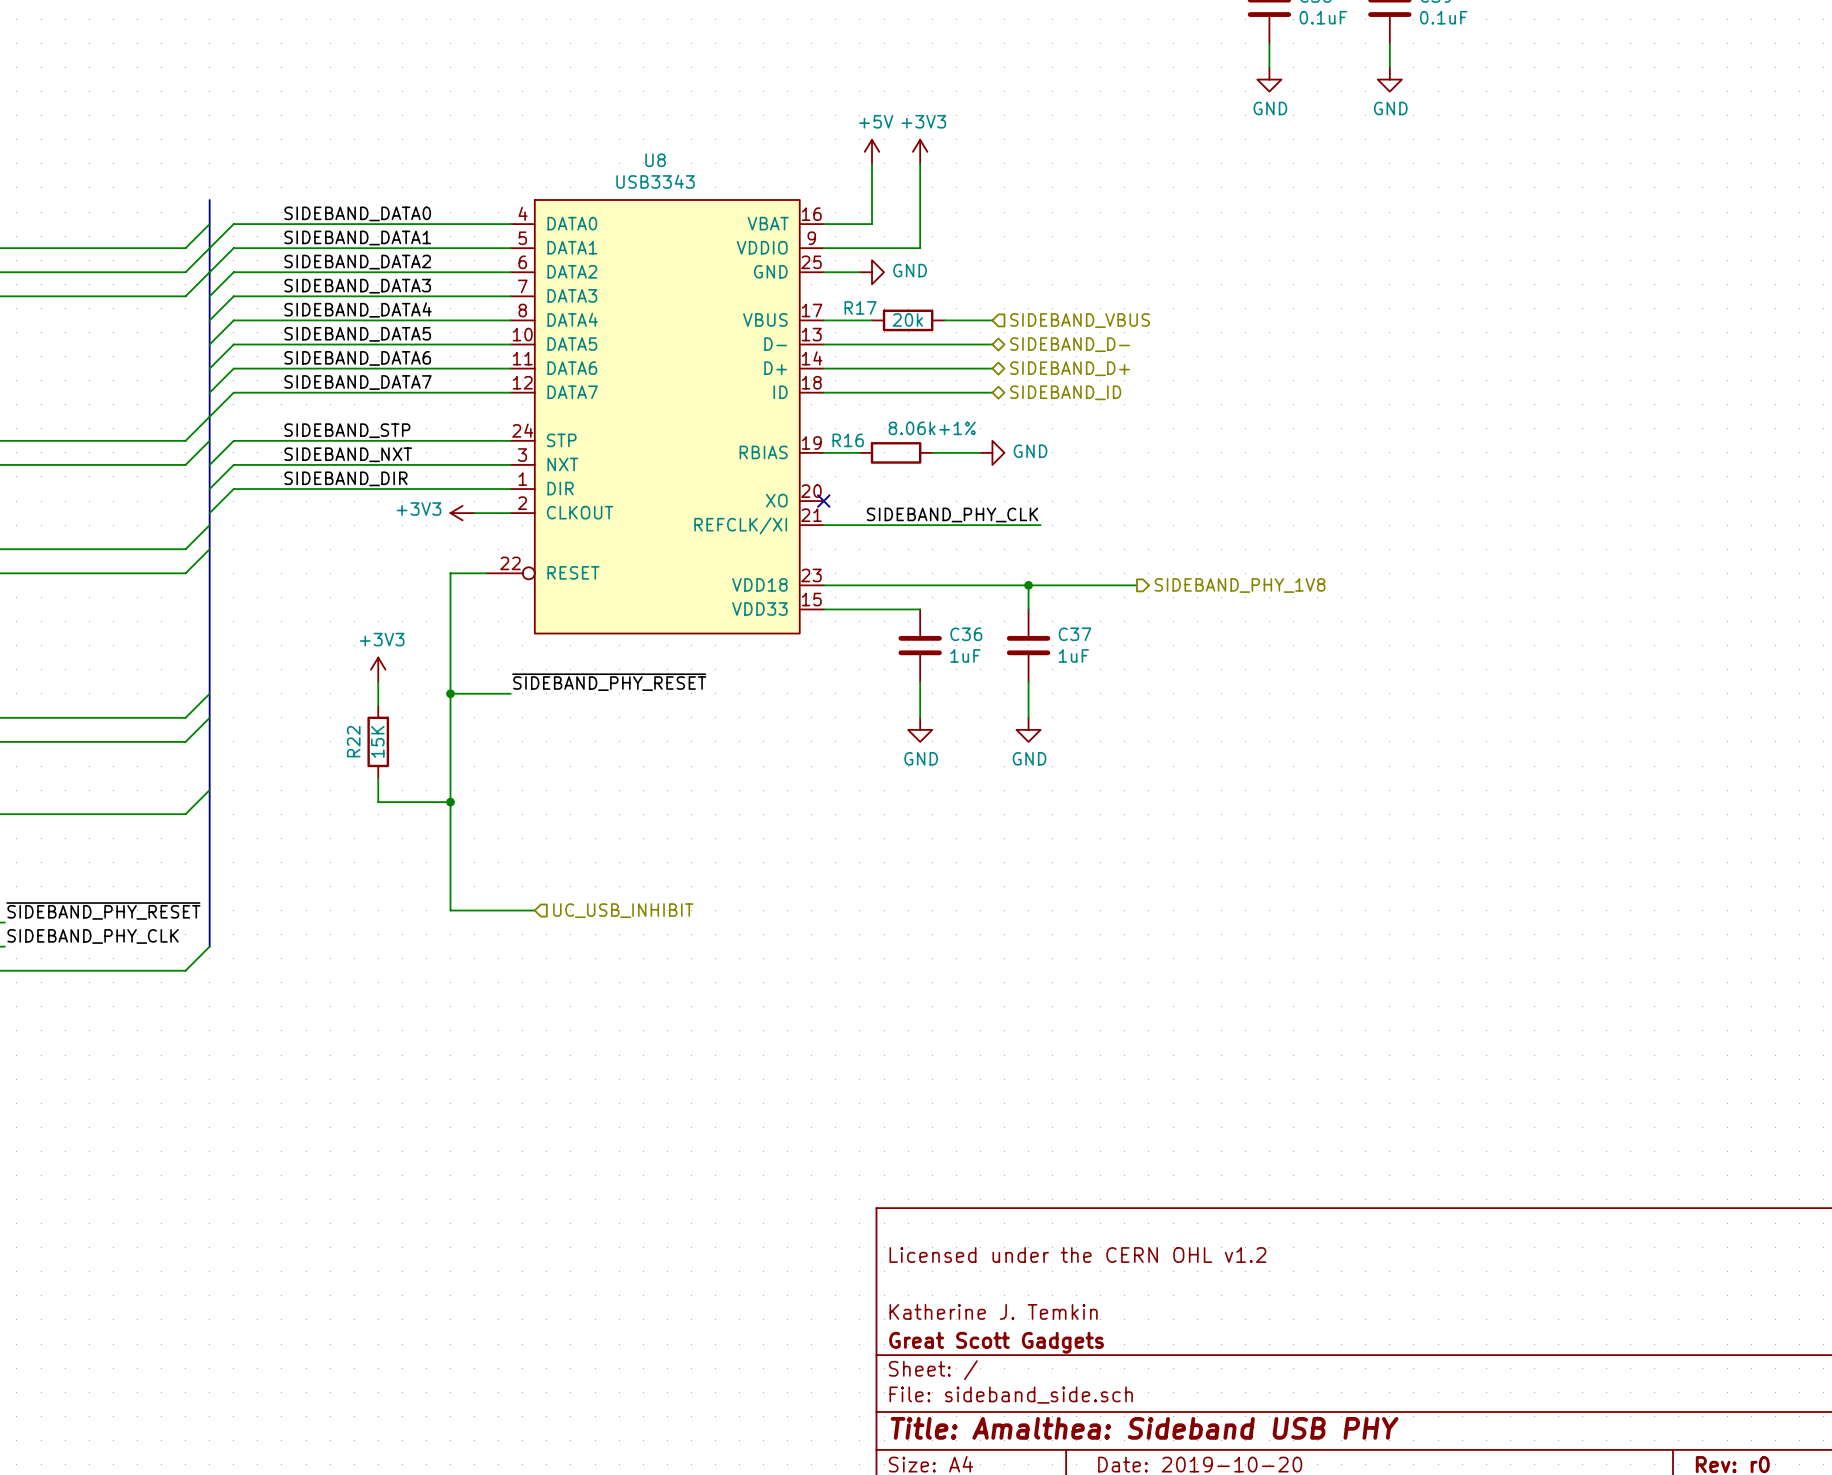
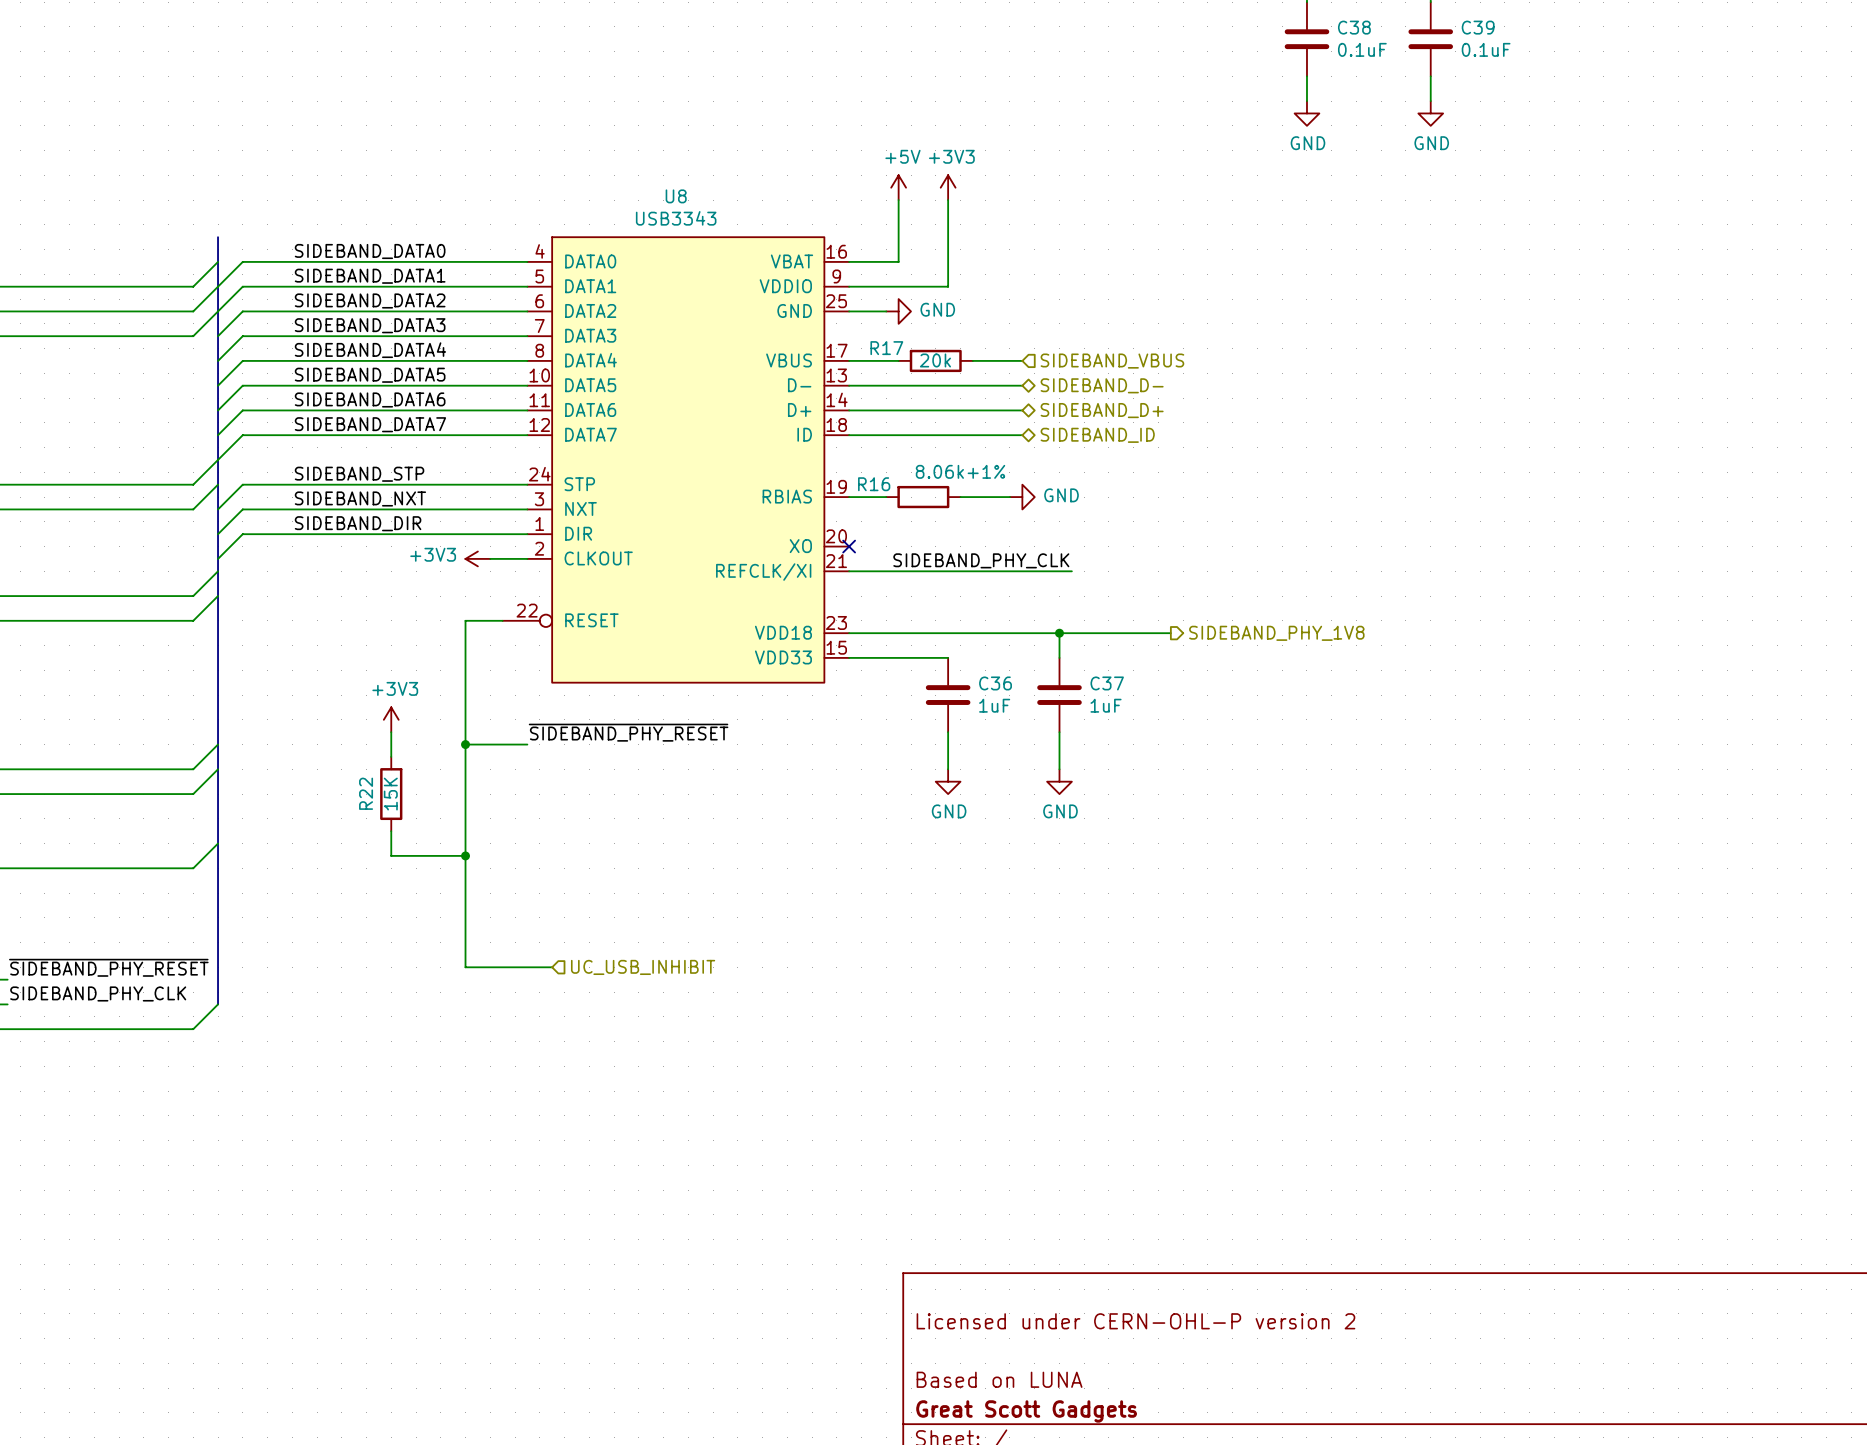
title block: Licensed under the CERN OHL v1.2 (1077, 1255) -> Licensed under CERN-OHL-P version 2 (1135, 1321)
title block: Katherine J. Temkin (993, 1311) -> Based on LUNA (999, 1379)

